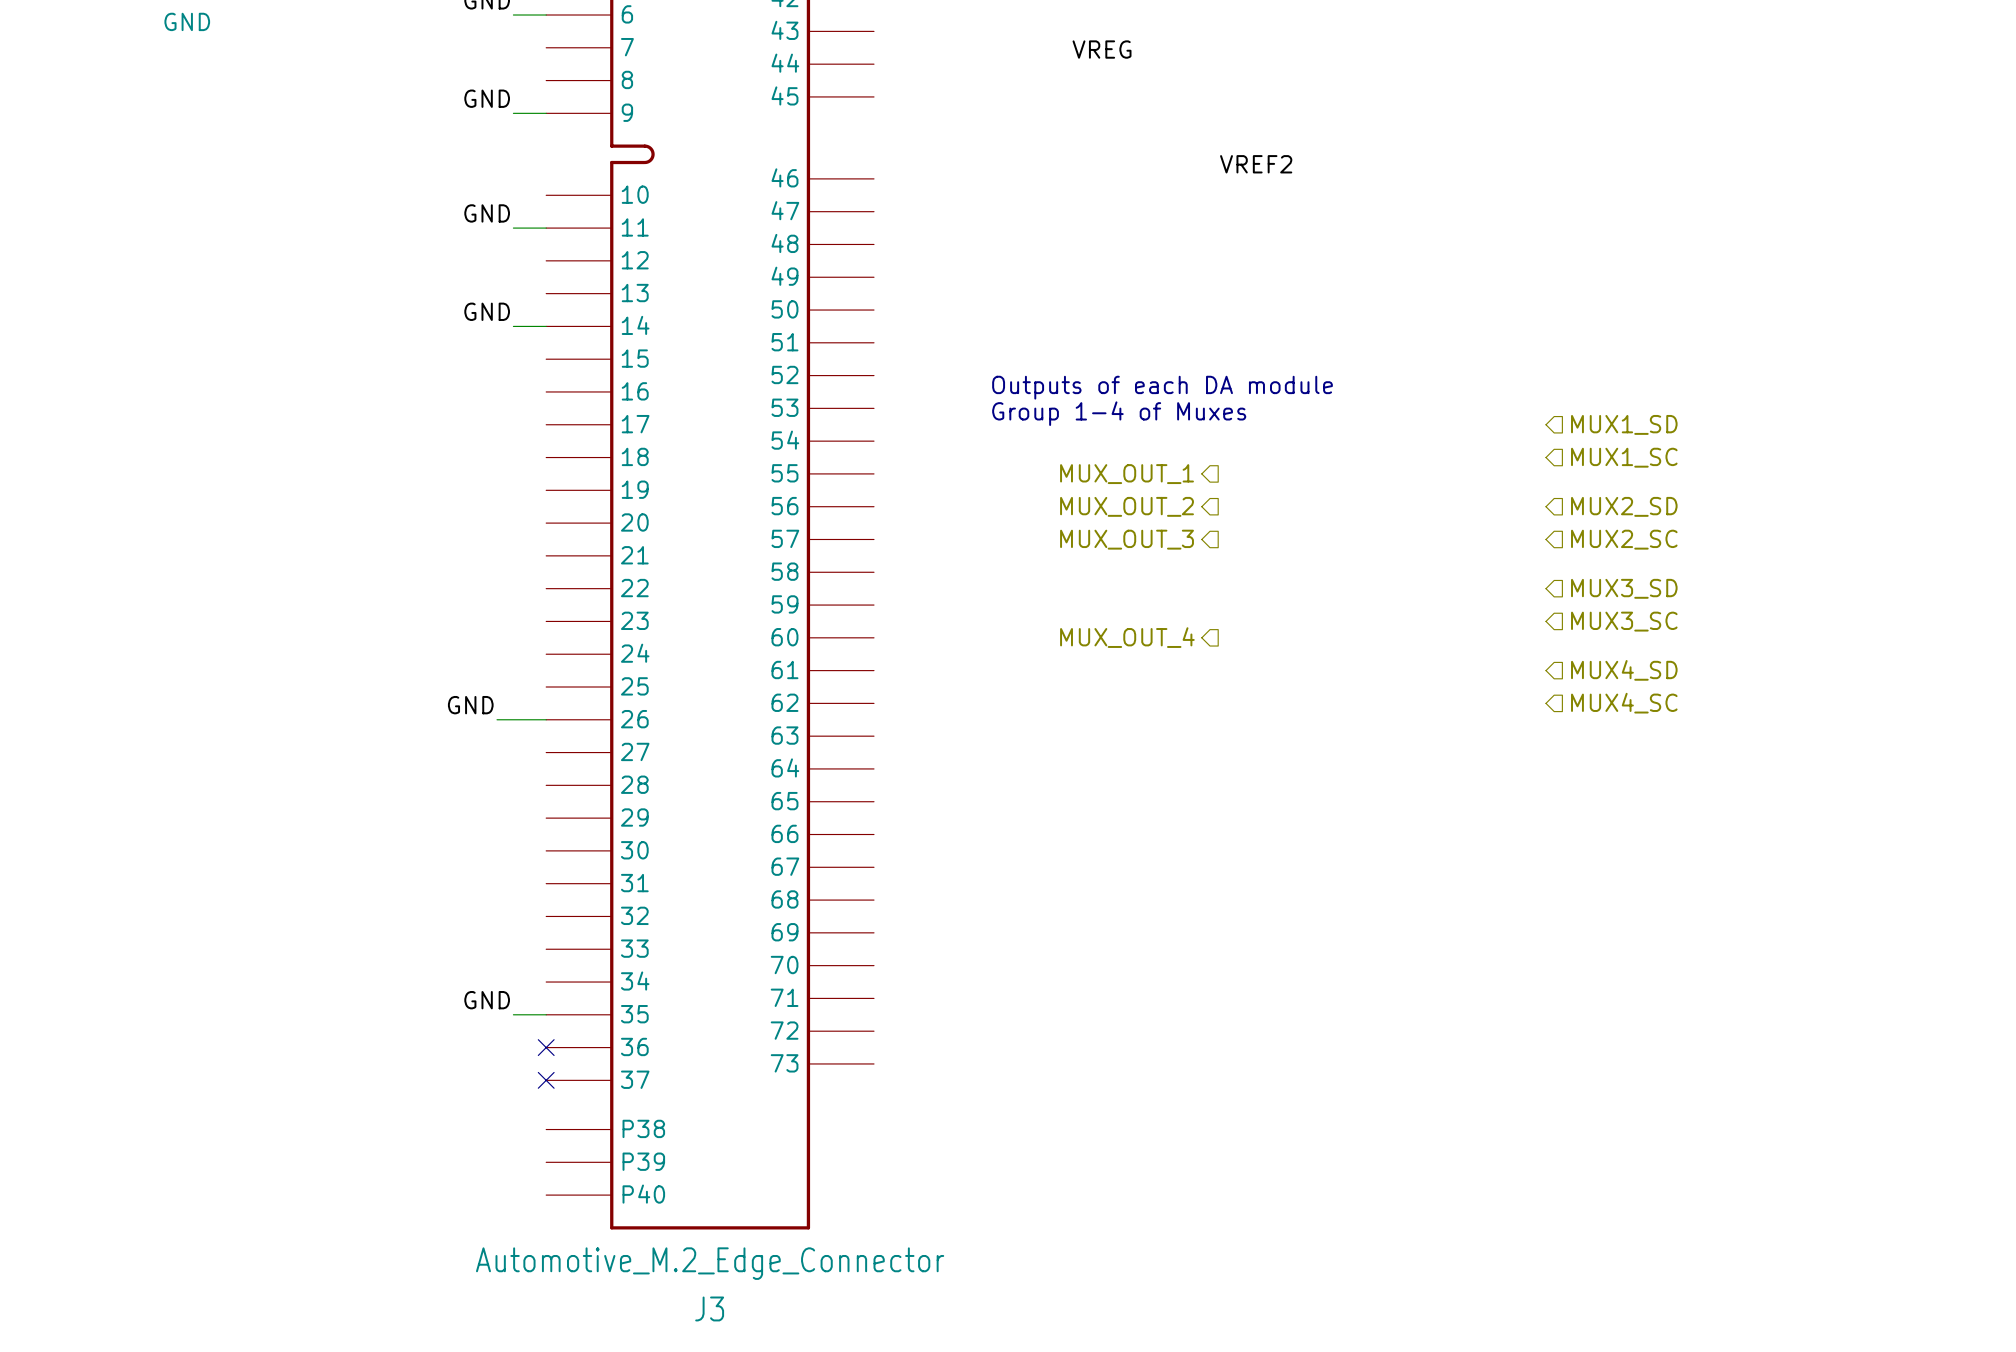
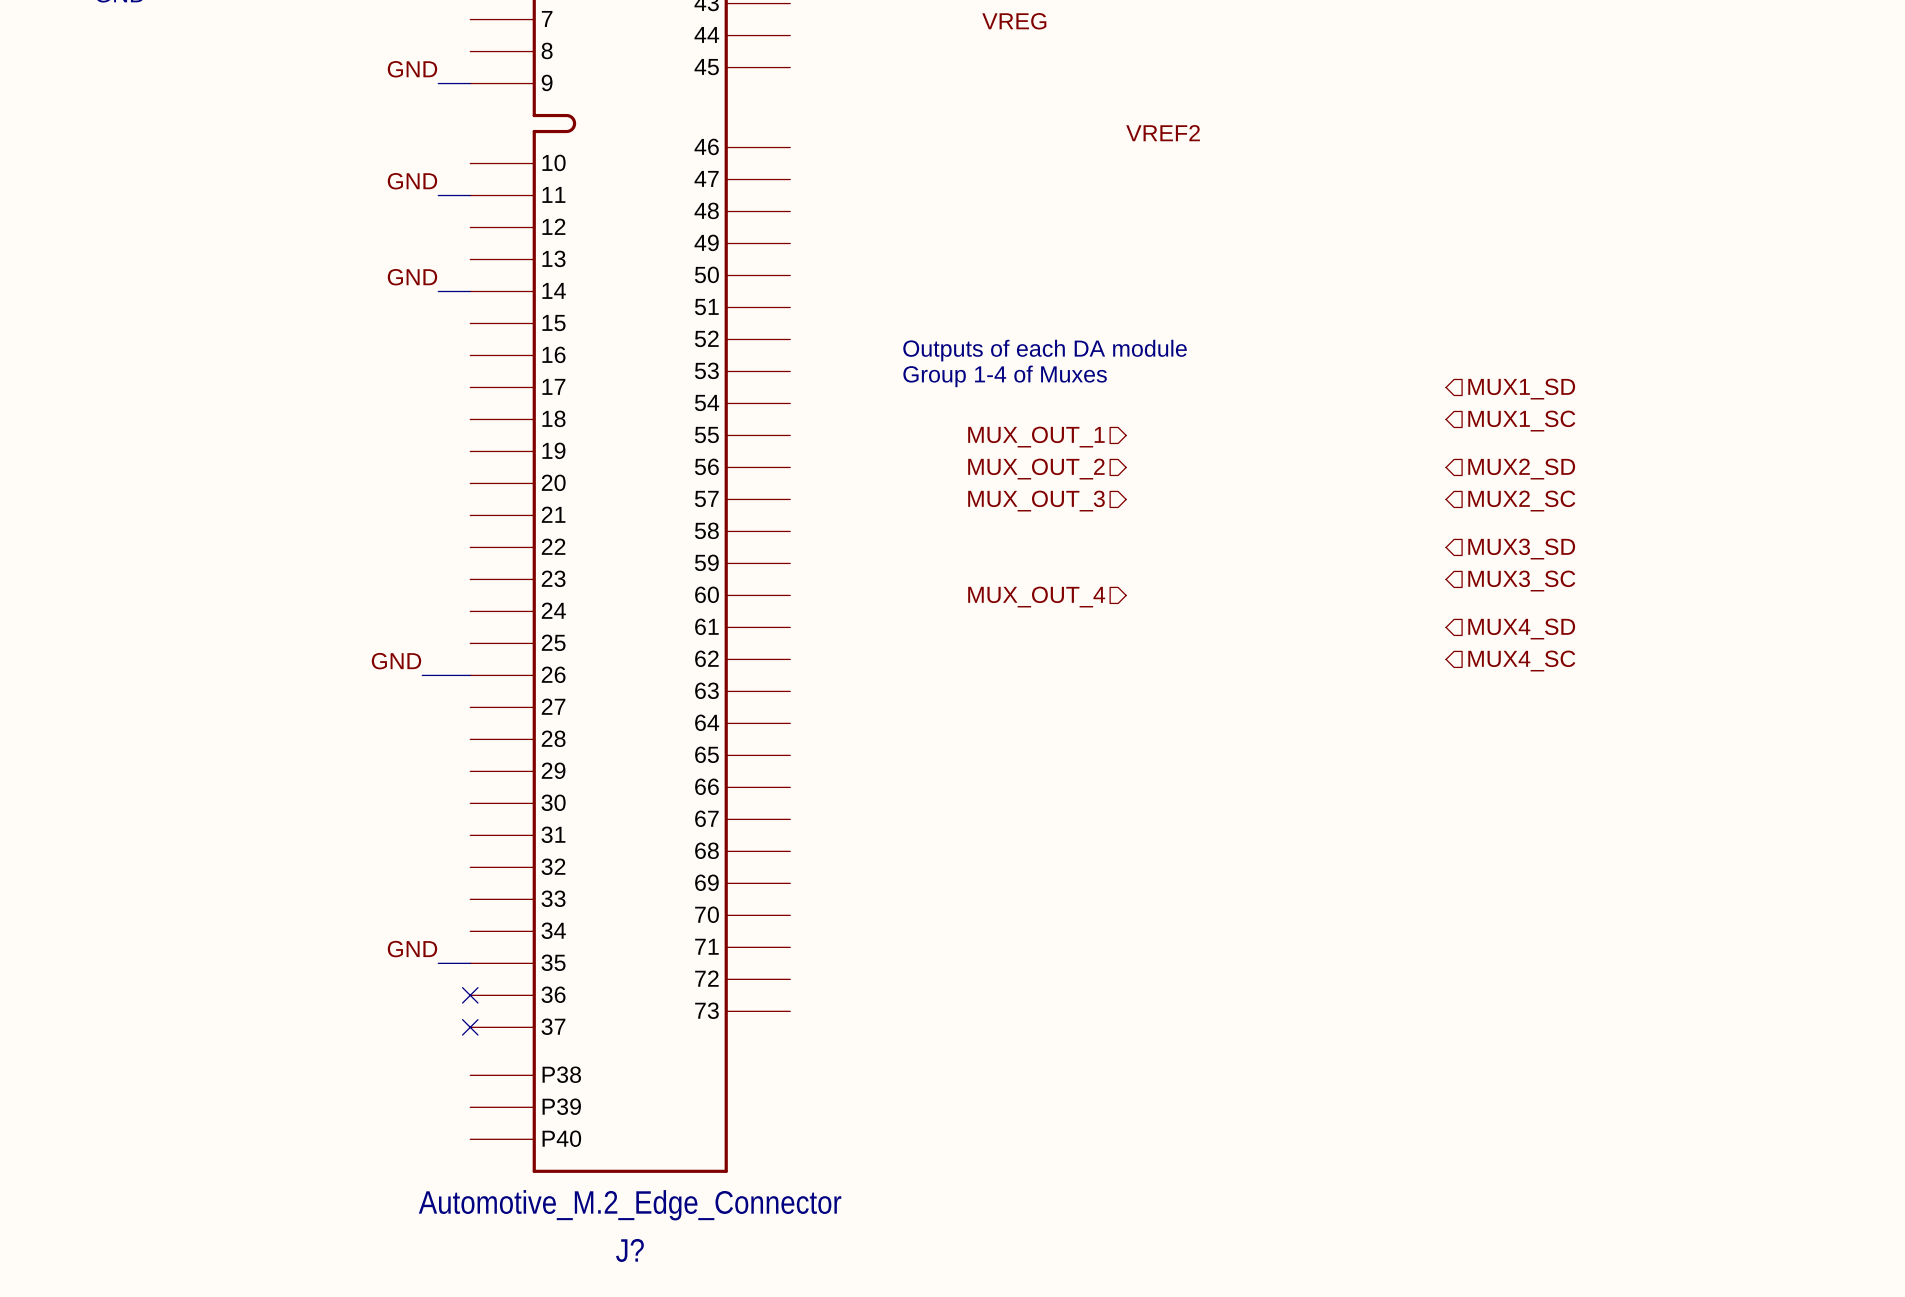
hierarchical label shape: output (1127, 474) -> input (1036, 437)
hierarchical label shape: output (1127, 506) -> input (1036, 469)
hierarchical label shape: output (1127, 539) -> input (1036, 501)
hierarchical label shape: output (1127, 637) -> input (1036, 597)
J3 name: J3 (709, 1308) -> J? (629, 1250)

